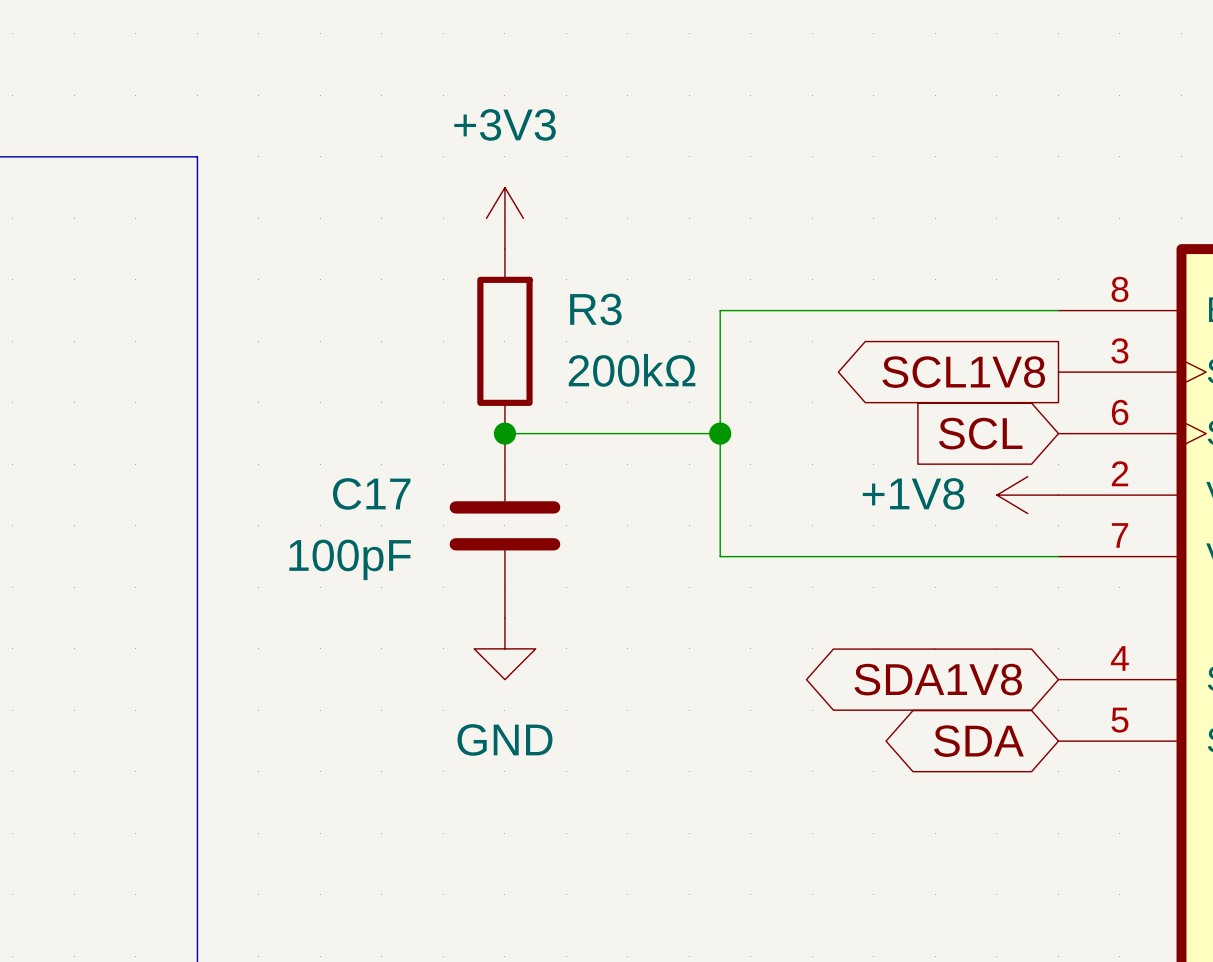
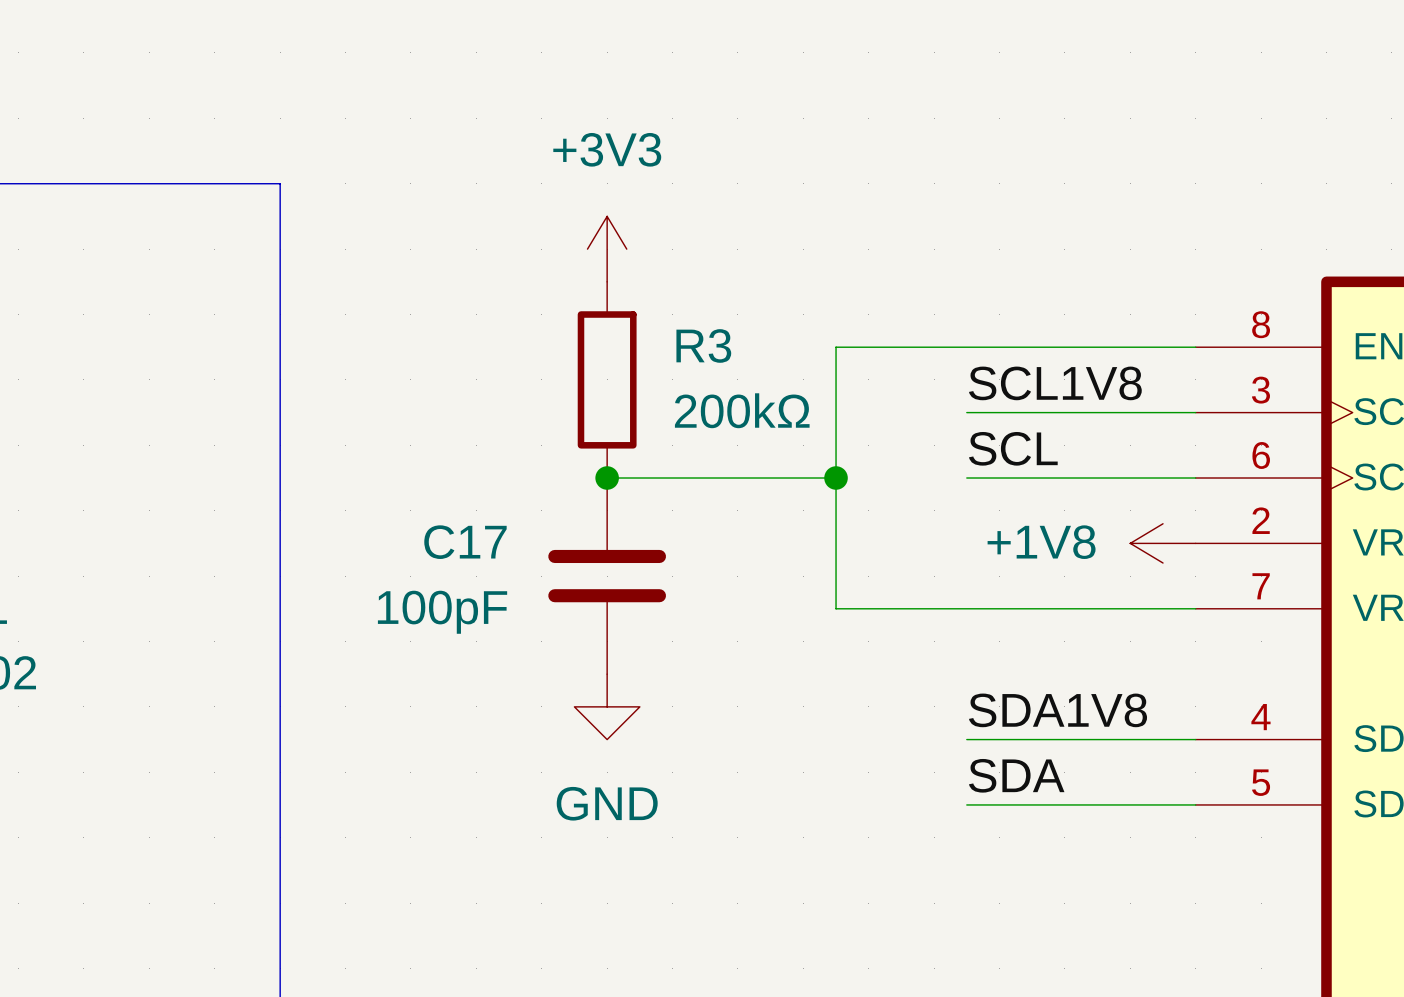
label: none -> SCL1V8 (1055, 383)
wire: none -> (966, 412) (1195, 412)
global label: SCL1V8 (963, 372) -> none
label: none -> SCL (1013, 448)
wire: none -> (966, 478) (1195, 478)
global label: SCL (980, 433) -> none
label: none -> SDA1V8 (1058, 710)
wire: none -> (966, 739) (1195, 739)
global label: SDA1V8 (938, 679) -> none
label: none -> SDA (1016, 775)
wire: none -> (966, 804) (1195, 804)
global label: SDA (978, 741) -> none

